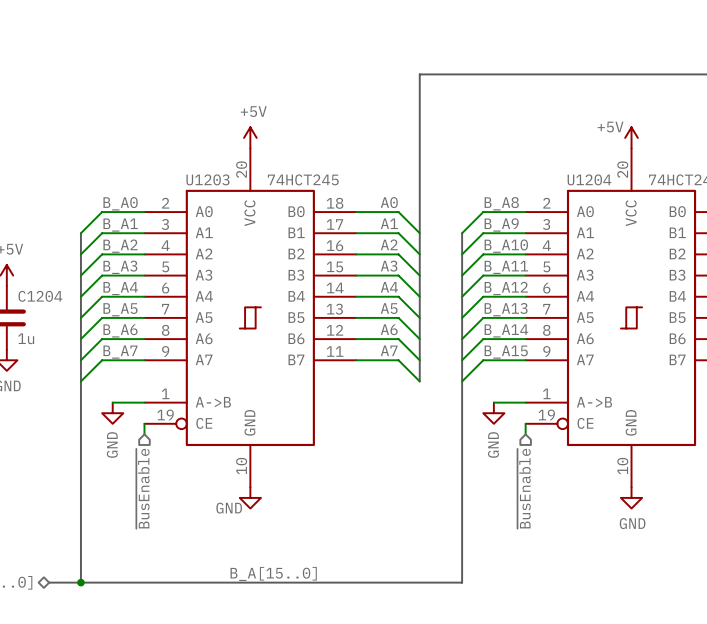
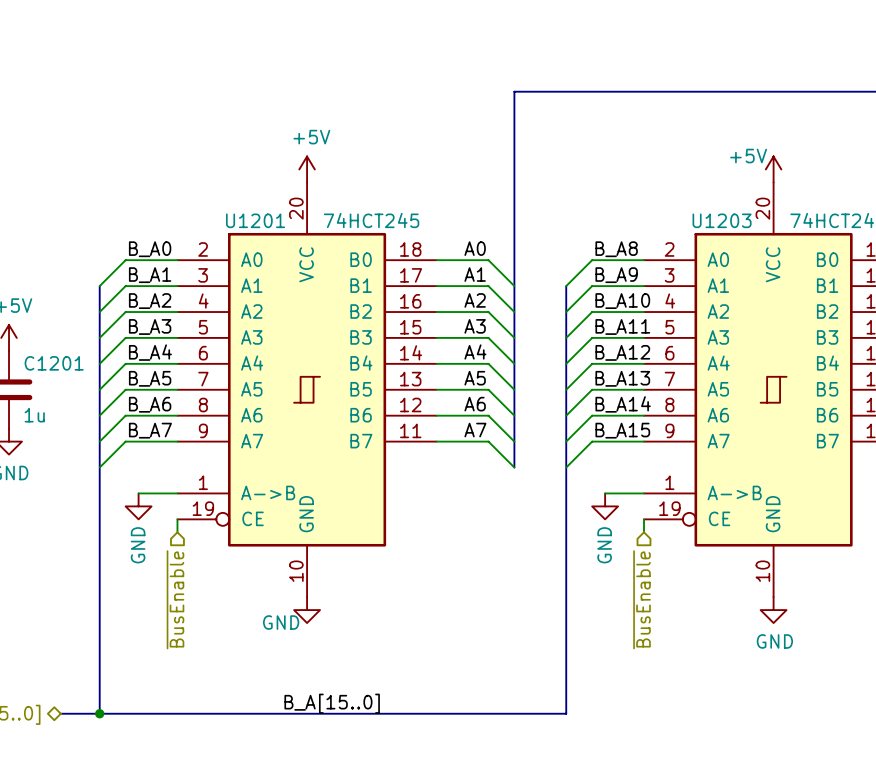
U1203 name: U1203 (207, 179) -> U1201 (255, 220)
U1204 name: U1204 (589, 179) -> U1203 (722, 220)
C1204 name: C1204 (40, 296) -> C1201 (54, 363)

